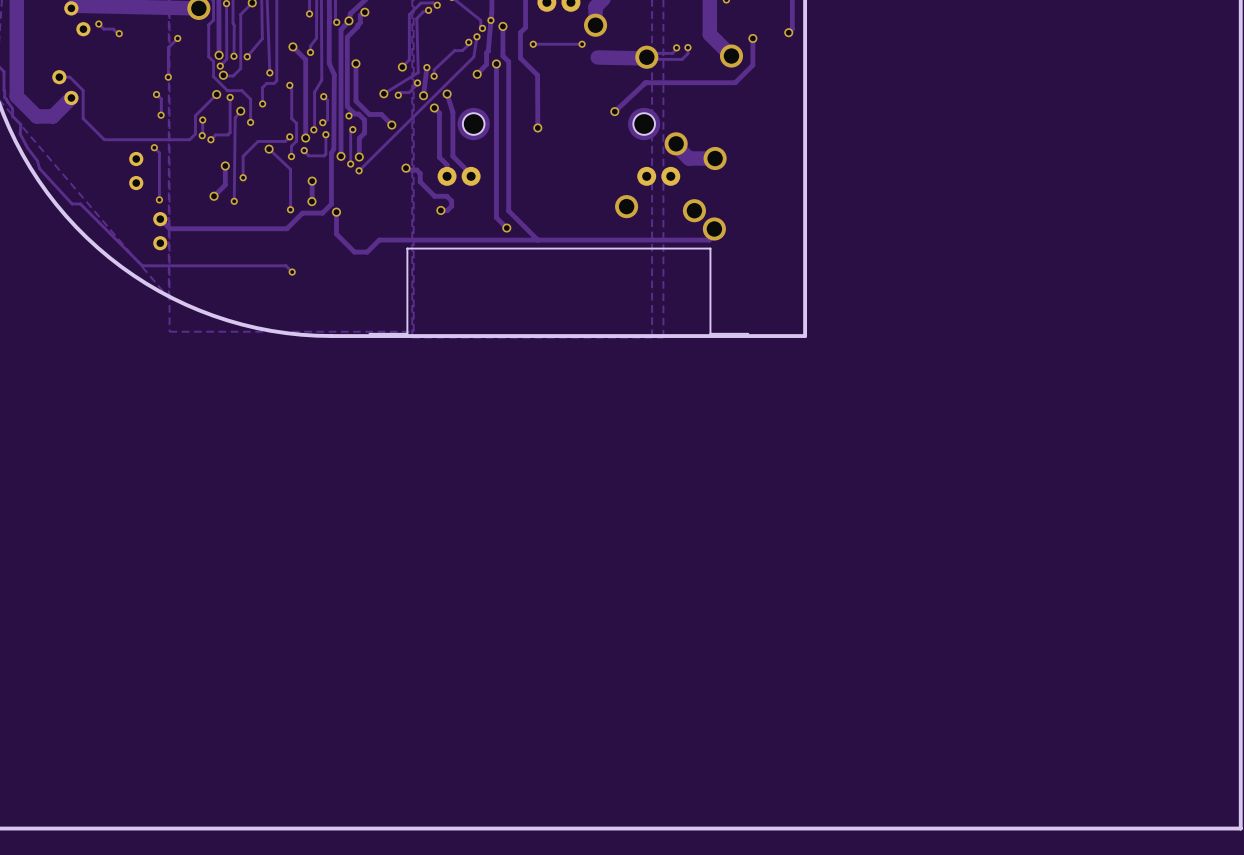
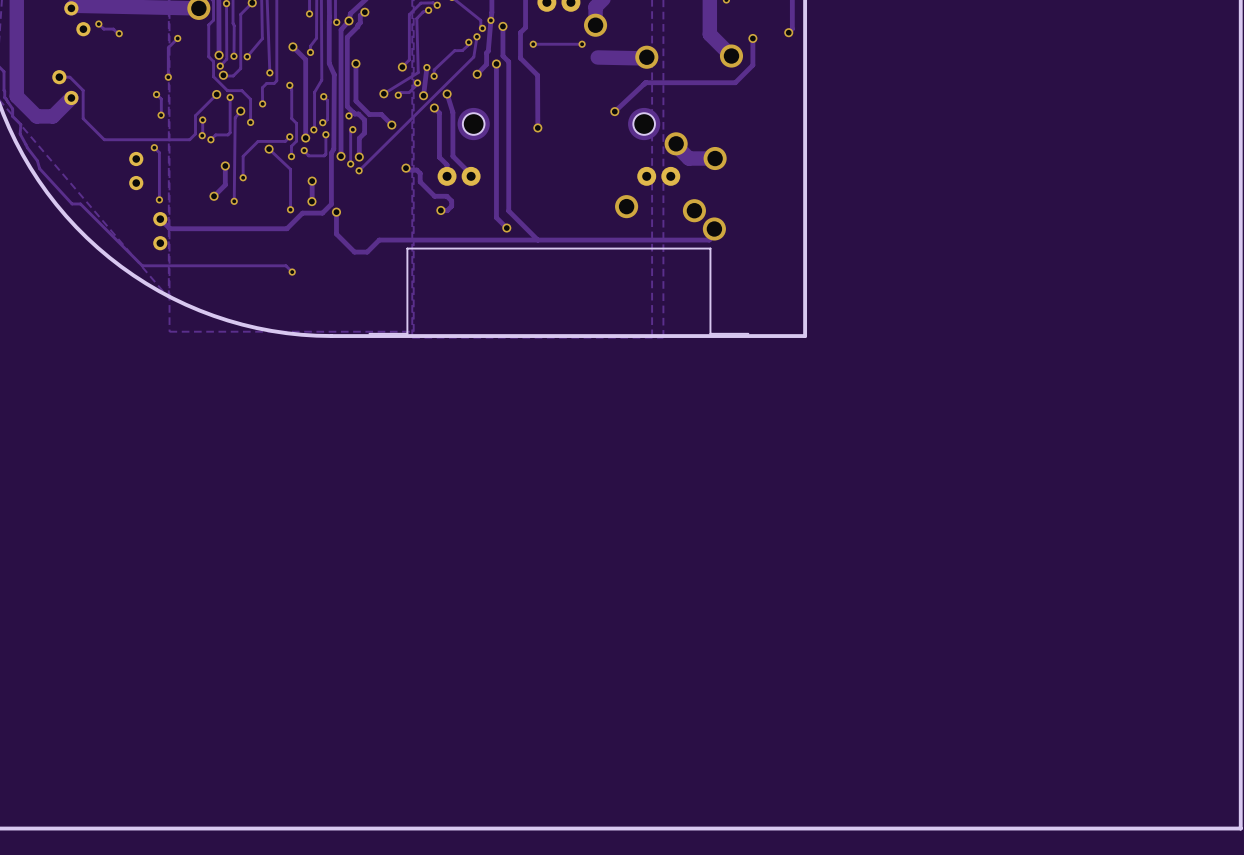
via: (676, 47) -> none
track: (687, 47) (687, 53) (682, 59) (645, 58) (650, 53) (672, 53) (676, 47) -> none
via: (687, 47) -> none

